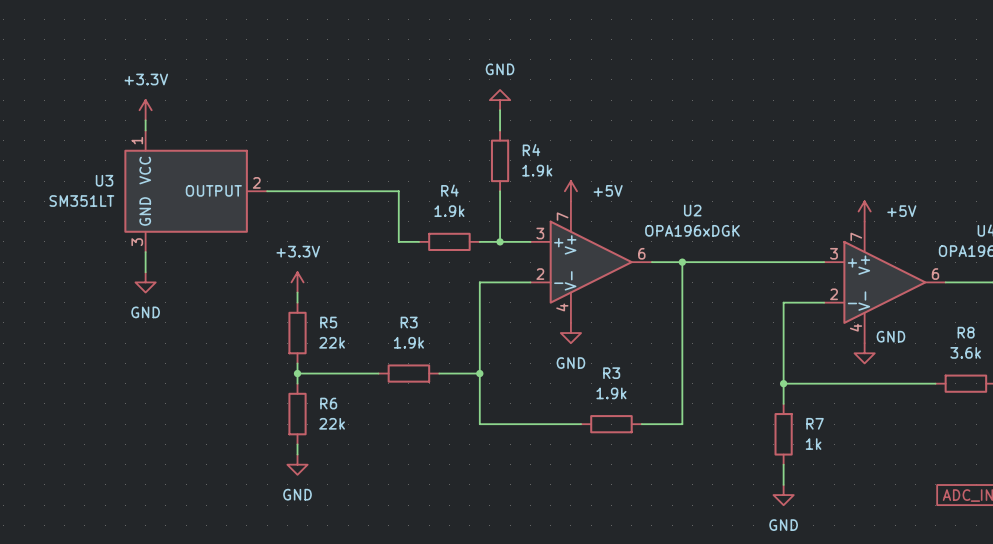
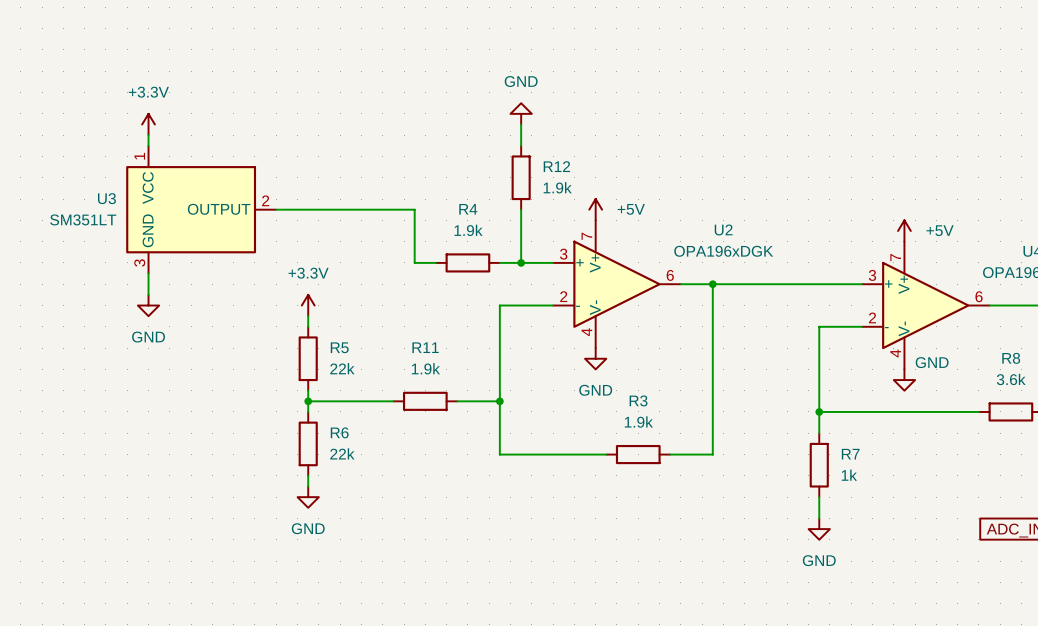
R4 name: R4 (531, 150) -> R12 (556, 166)
R3 name: R3 (409, 322) -> R11 (425, 347)

